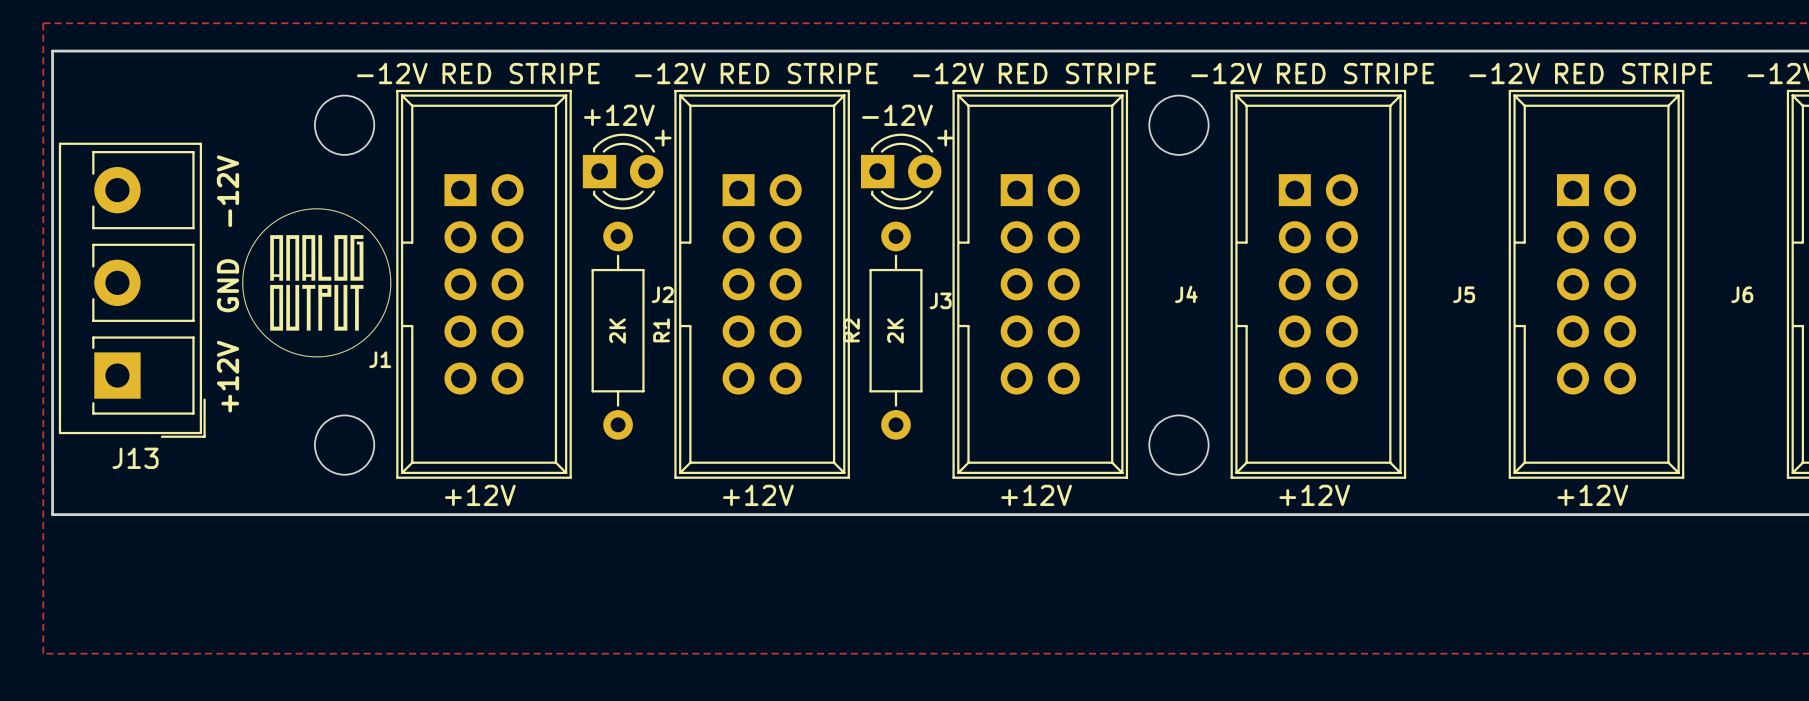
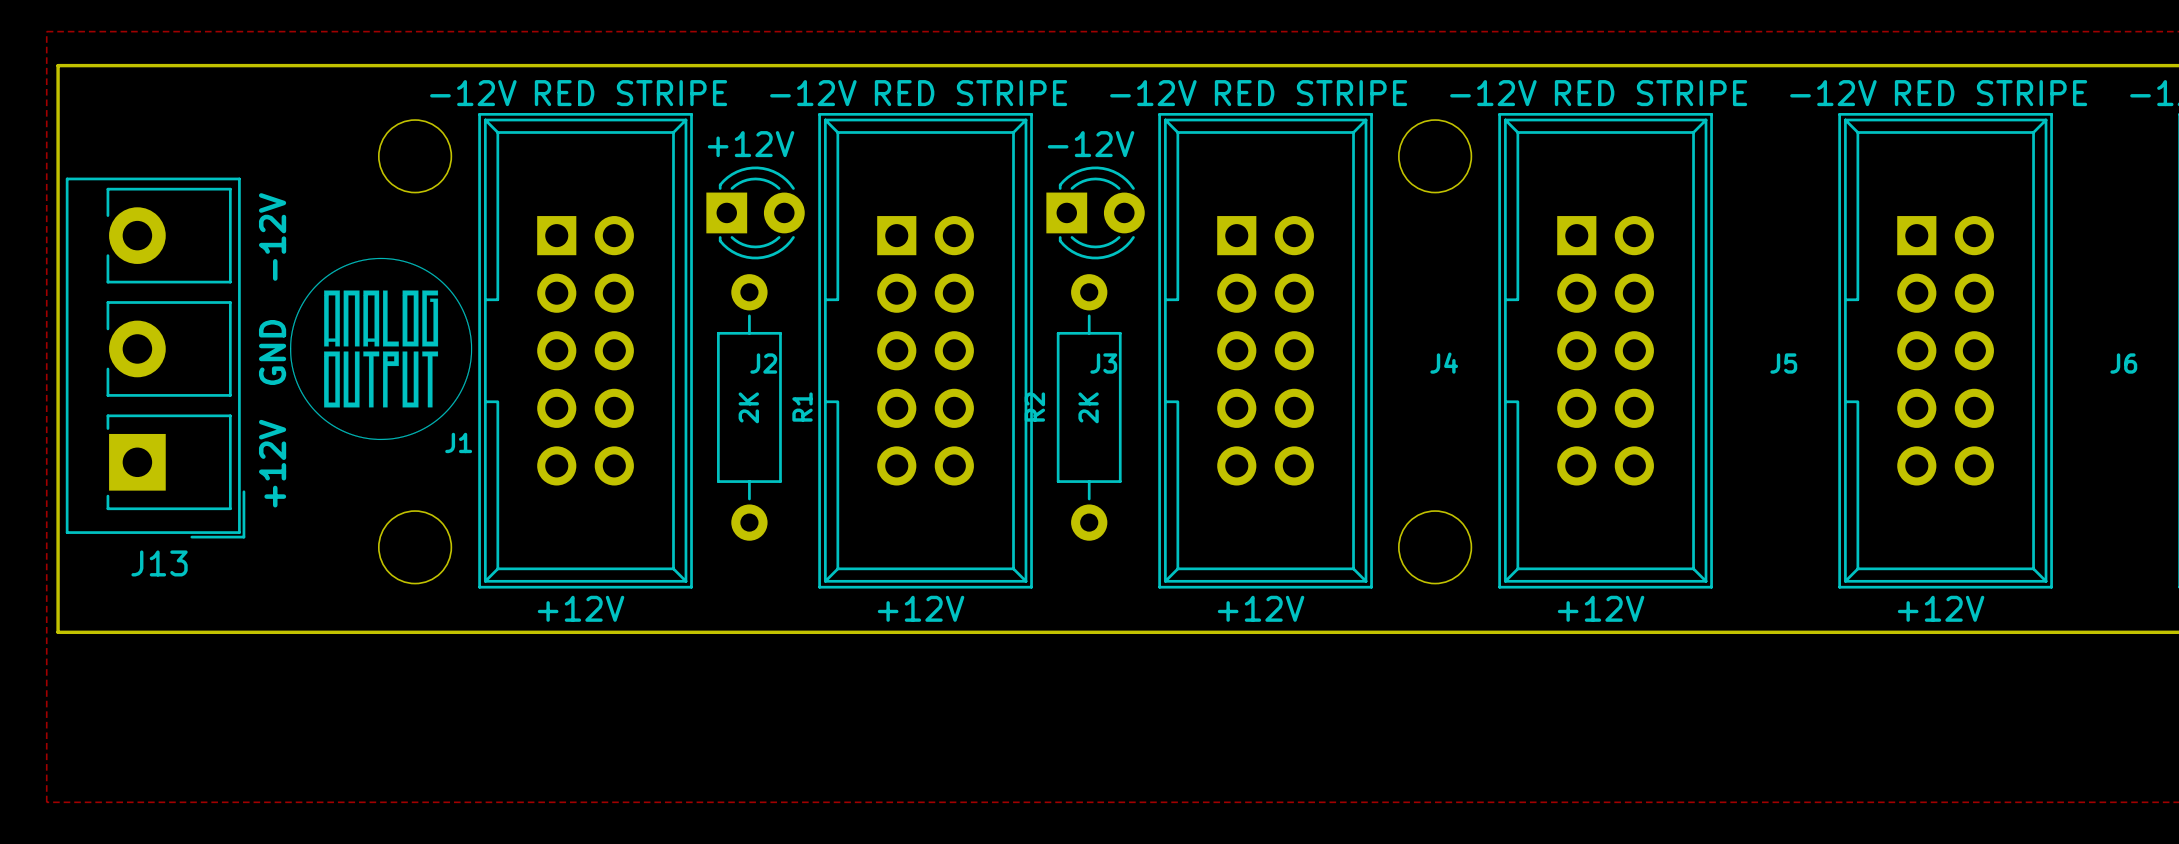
text: + (663, 138) -> none
text: + (945, 138) -> none
J2 name position: J2 (662, 294) -> J2 (763, 363)
J3 name position: J3 (940, 300) -> J3 (1103, 363)

